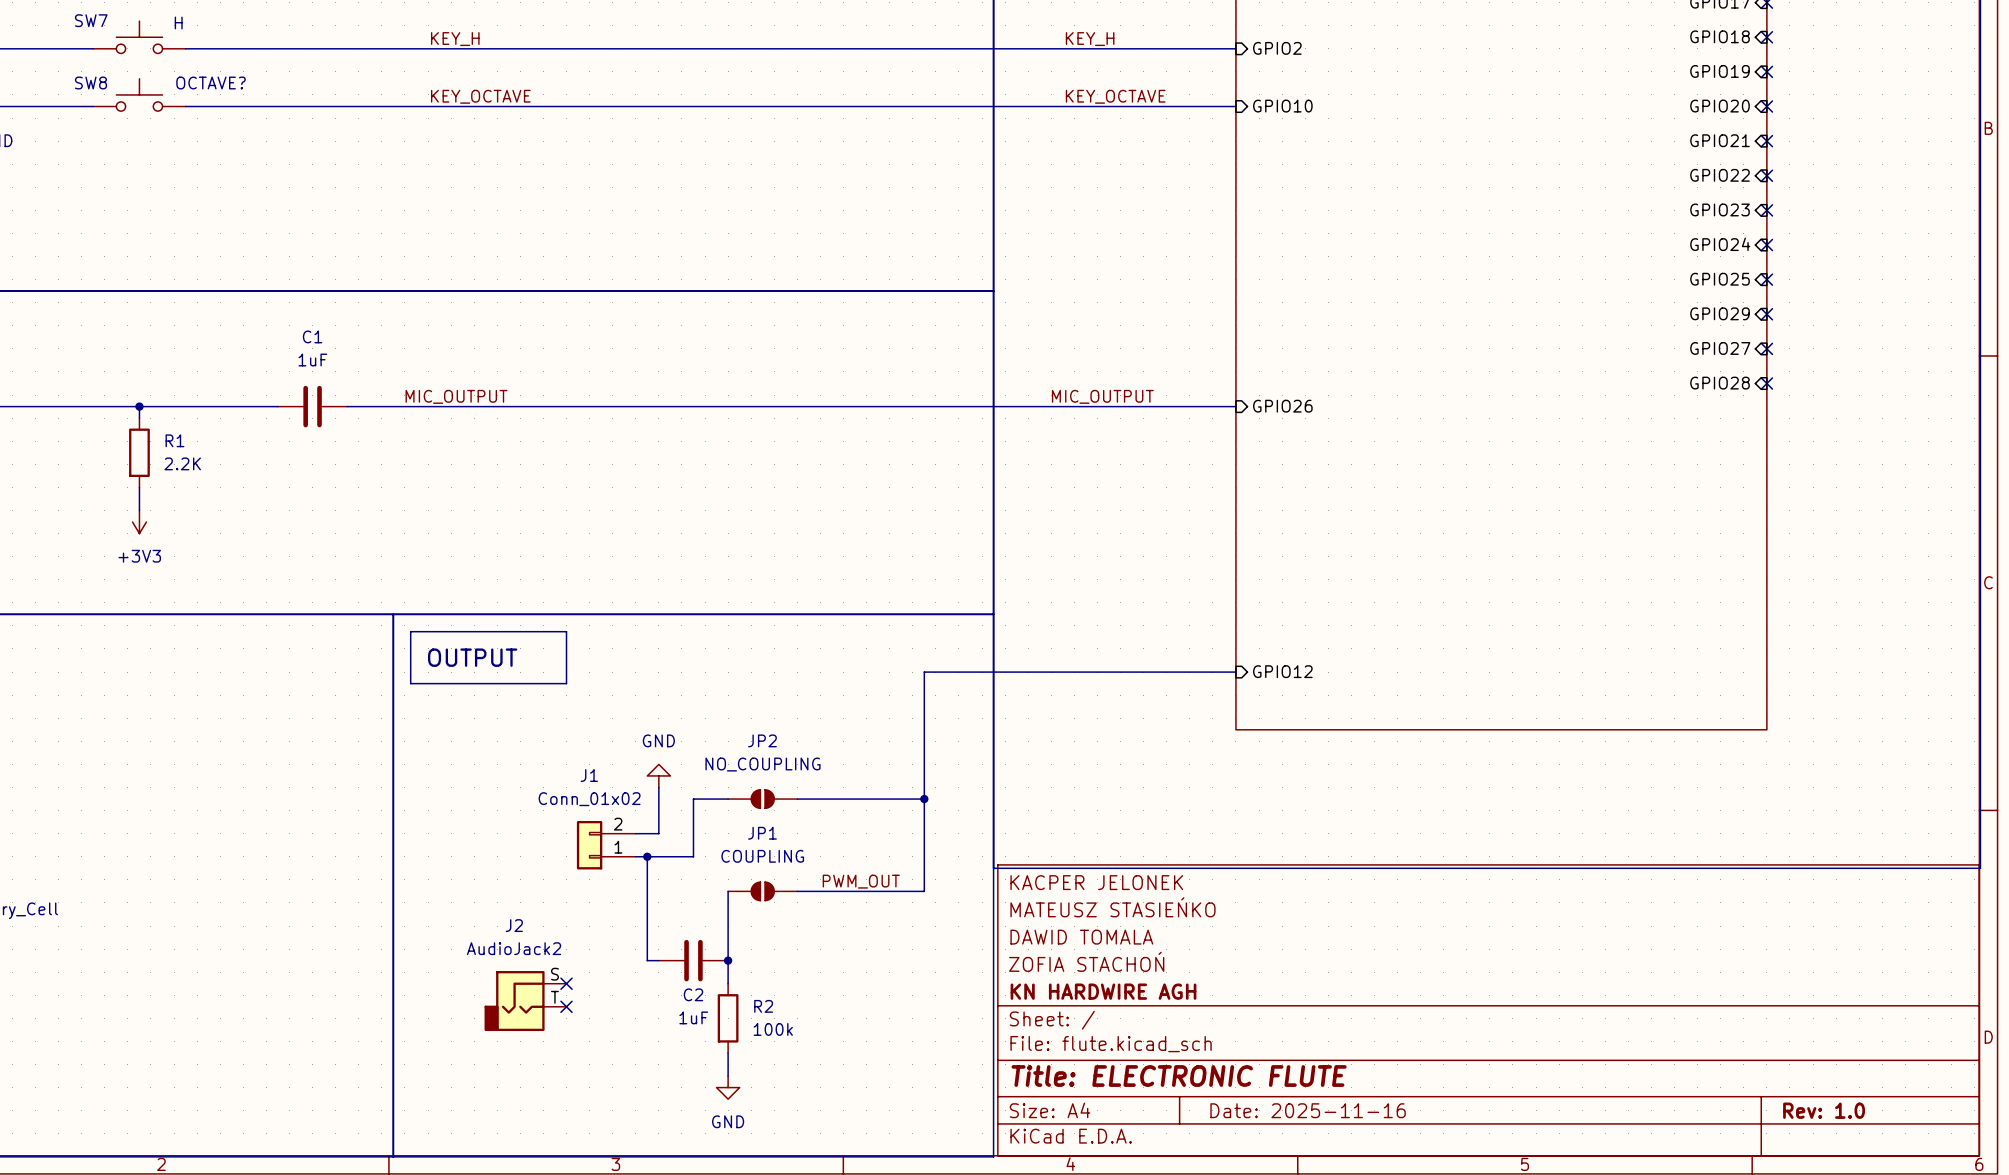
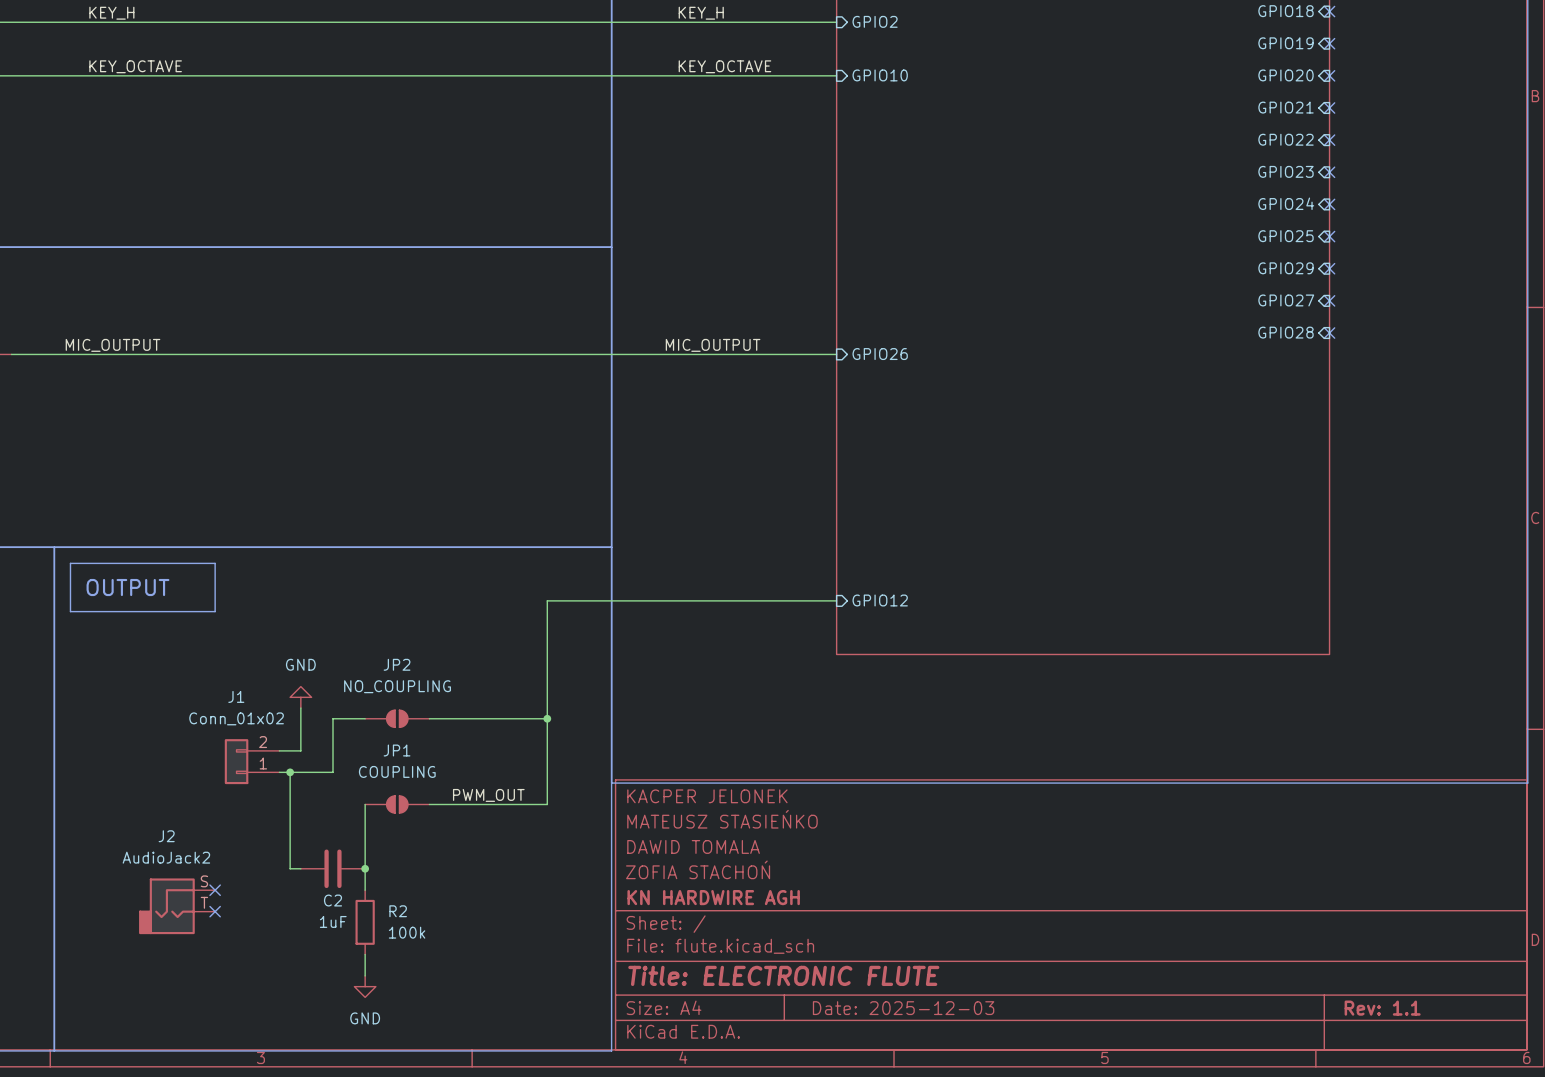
title block: Date: 2025-11-16 (1308, 1110) -> Date: 2025-12-03 (903, 1008)
title block: Rev: 1.0 (1824, 1110) -> Rev: 1.1 (1382, 1008)

